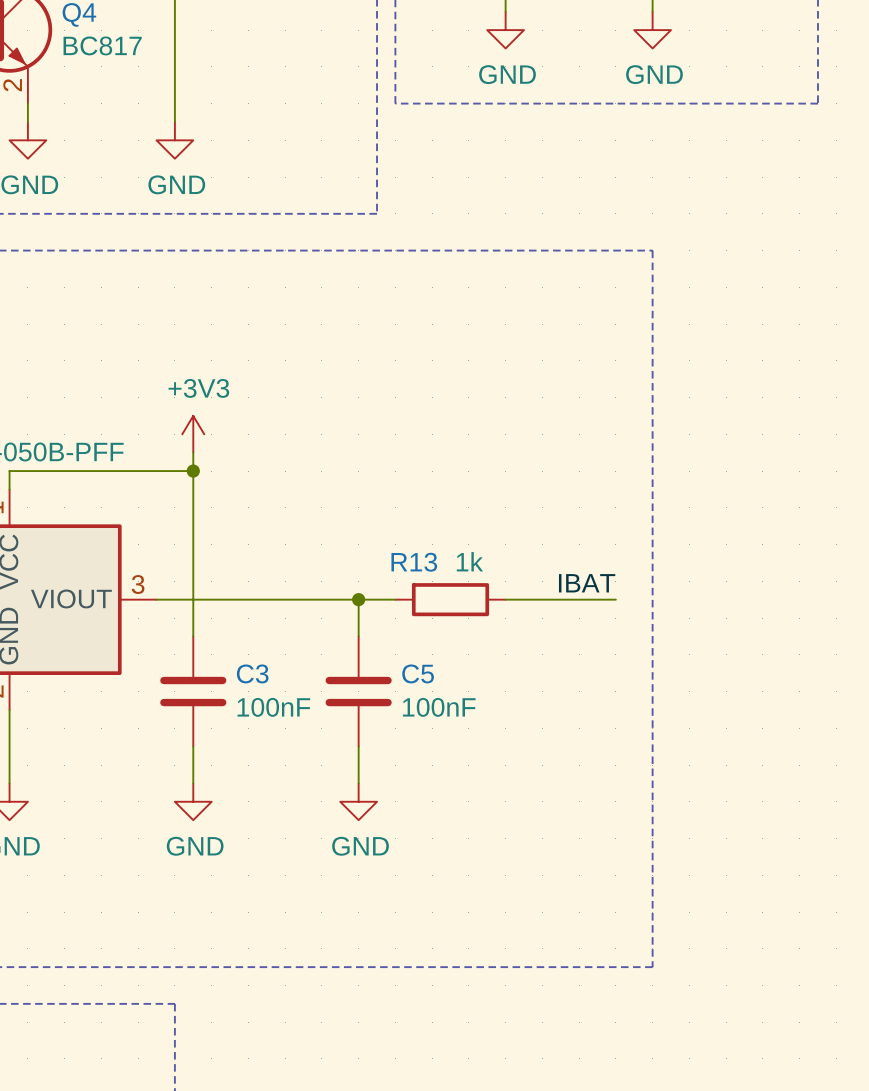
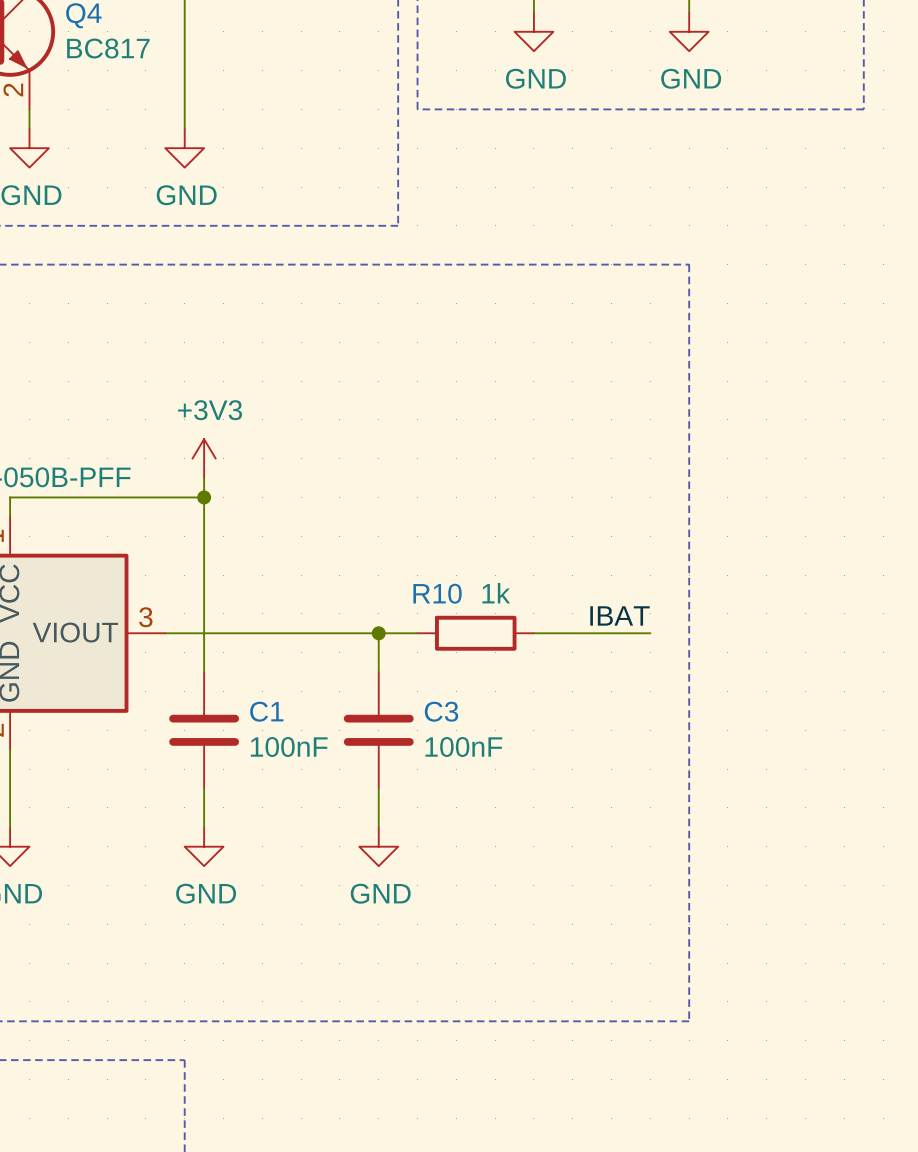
R13 name: R13 (414, 562) -> R10 (437, 593)
C3 name: C3 (252, 673) -> C1 (266, 711)
C5 name: C5 (418, 673) -> C3 (441, 711)

